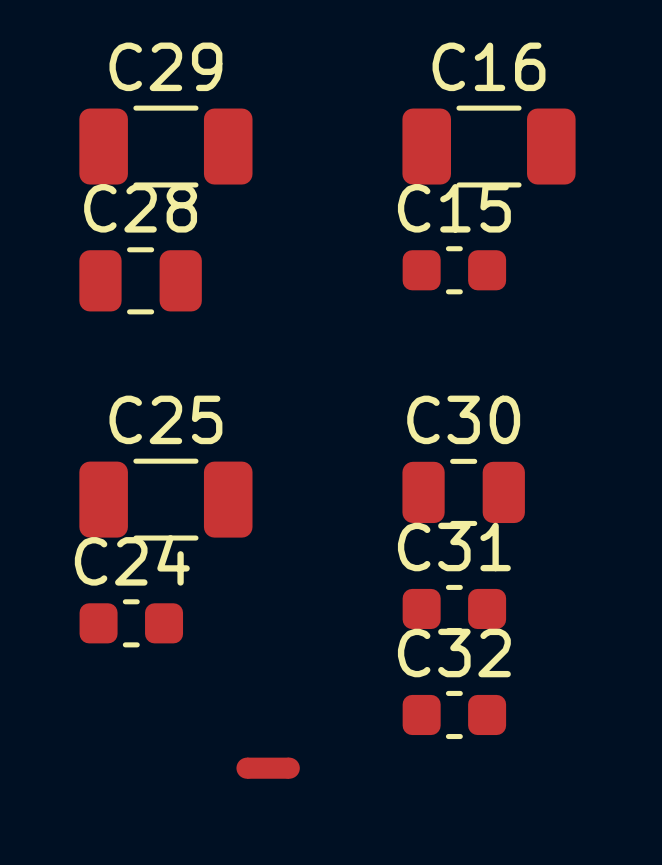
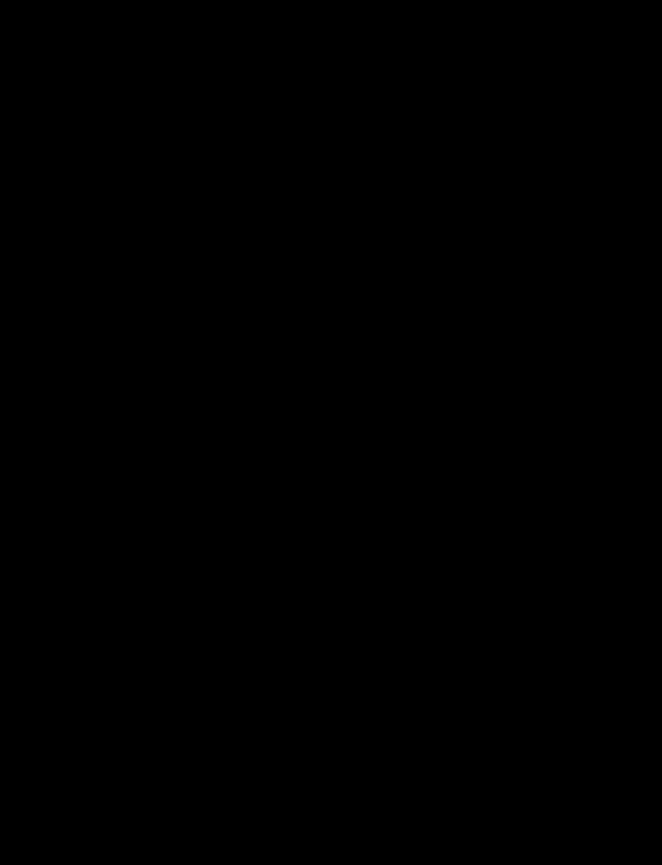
C29: (165, 146) -> none
C16: (489, 146) -> none
C15: (454, 270) -> none
C28: (140, 280) -> none
C30: (463, 492) -> none
C25: (165, 499) -> none
C31: (454, 608) -> none
C24: (131, 623) -> none
C32: (454, 714) -> none
part: (268, 768) -> none

